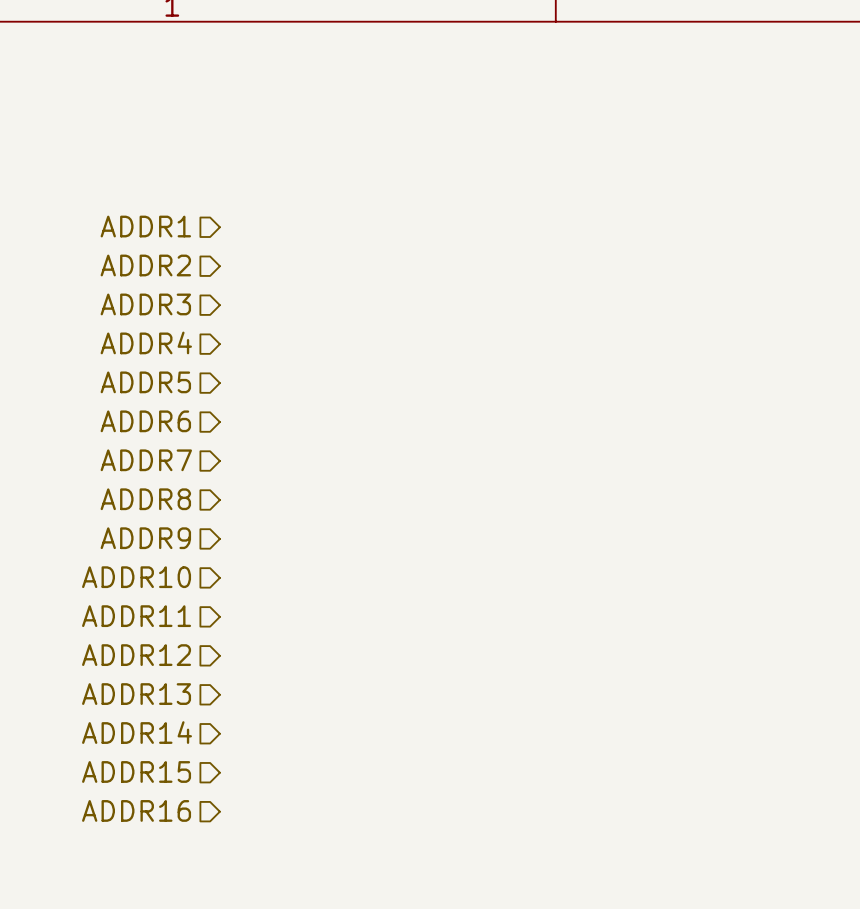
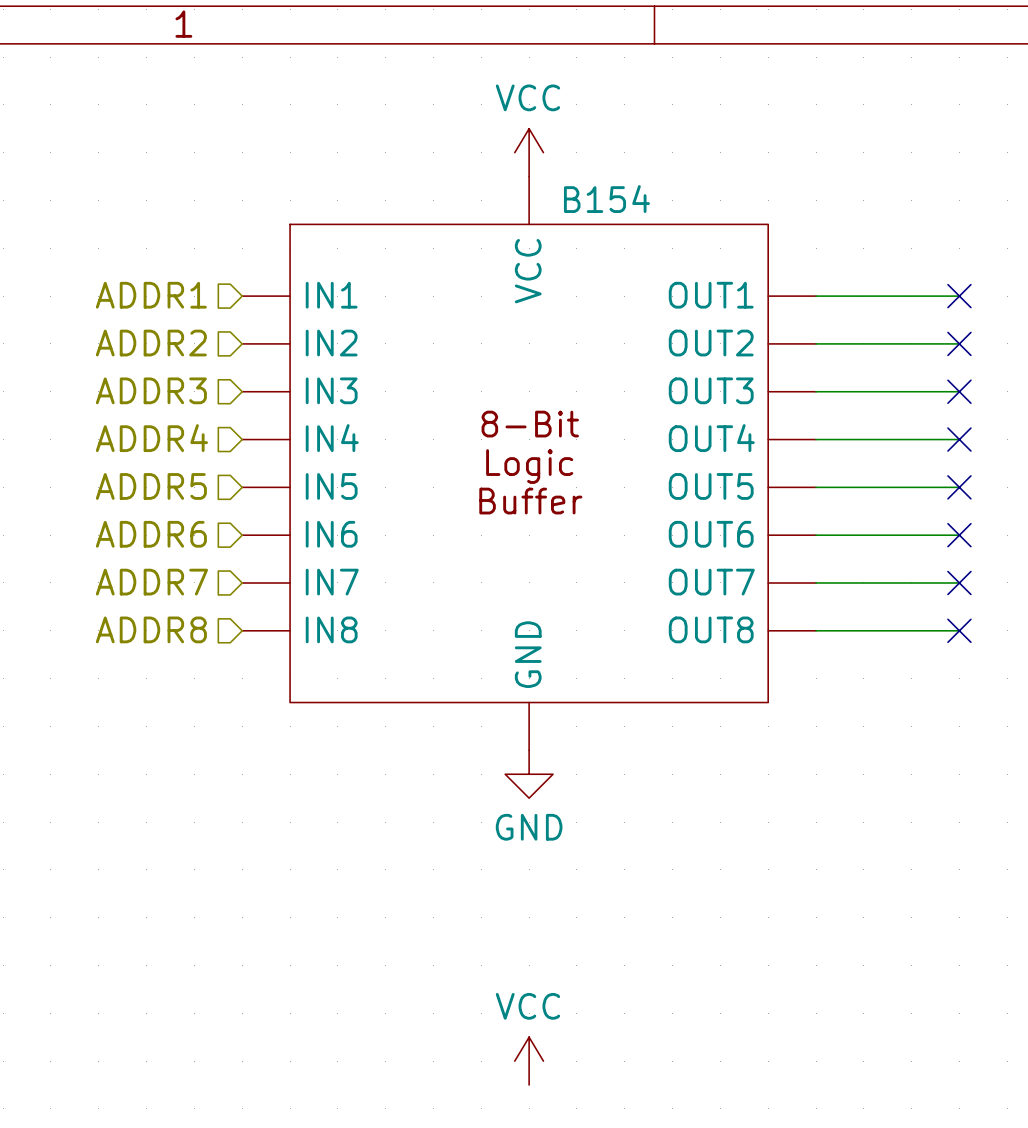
power symbol: none -> VCC (529, 152)
wire: none -> (816, 296) (959, 296)
no-connect mark: none -> (959, 296)
wire: none -> (816, 343) (959, 343)
no-connect mark: none -> (959, 343)
wire: none -> (816, 391) (959, 391)
no-connect mark: none -> (959, 391)
wire: none -> (816, 439) (959, 439)
no-connect mark: none -> (959, 439)
B154: none -> (529, 463)
wire: none -> (816, 487) (959, 487)
no-connect mark: none -> (959, 487)
wire: none -> (816, 535) (959, 535)
no-connect mark: none -> (959, 535)
wire: none -> (816, 582) (959, 582)
no-connect mark: none -> (959, 582)
wire: none -> (816, 630) (959, 630)
no-connect mark: none -> (959, 630)
hierarchical label: ADDR9 (145, 538) -> none
hierarchical label: ADDR10 (136, 577) -> none
hierarchical label: ADDR11 (136, 616) -> none
power symbol: none -> GND (529, 774)
hierarchical label: ADDR12 (136, 655) -> none
hierarchical label: ADDR13 (136, 694) -> none
hierarchical label: ADDR14 (137, 732) -> none
hierarchical label: ADDR15 (136, 771) -> none
hierarchical label: ADDR16 (136, 810) -> none
power symbol: none -> VCC (529, 1061)

